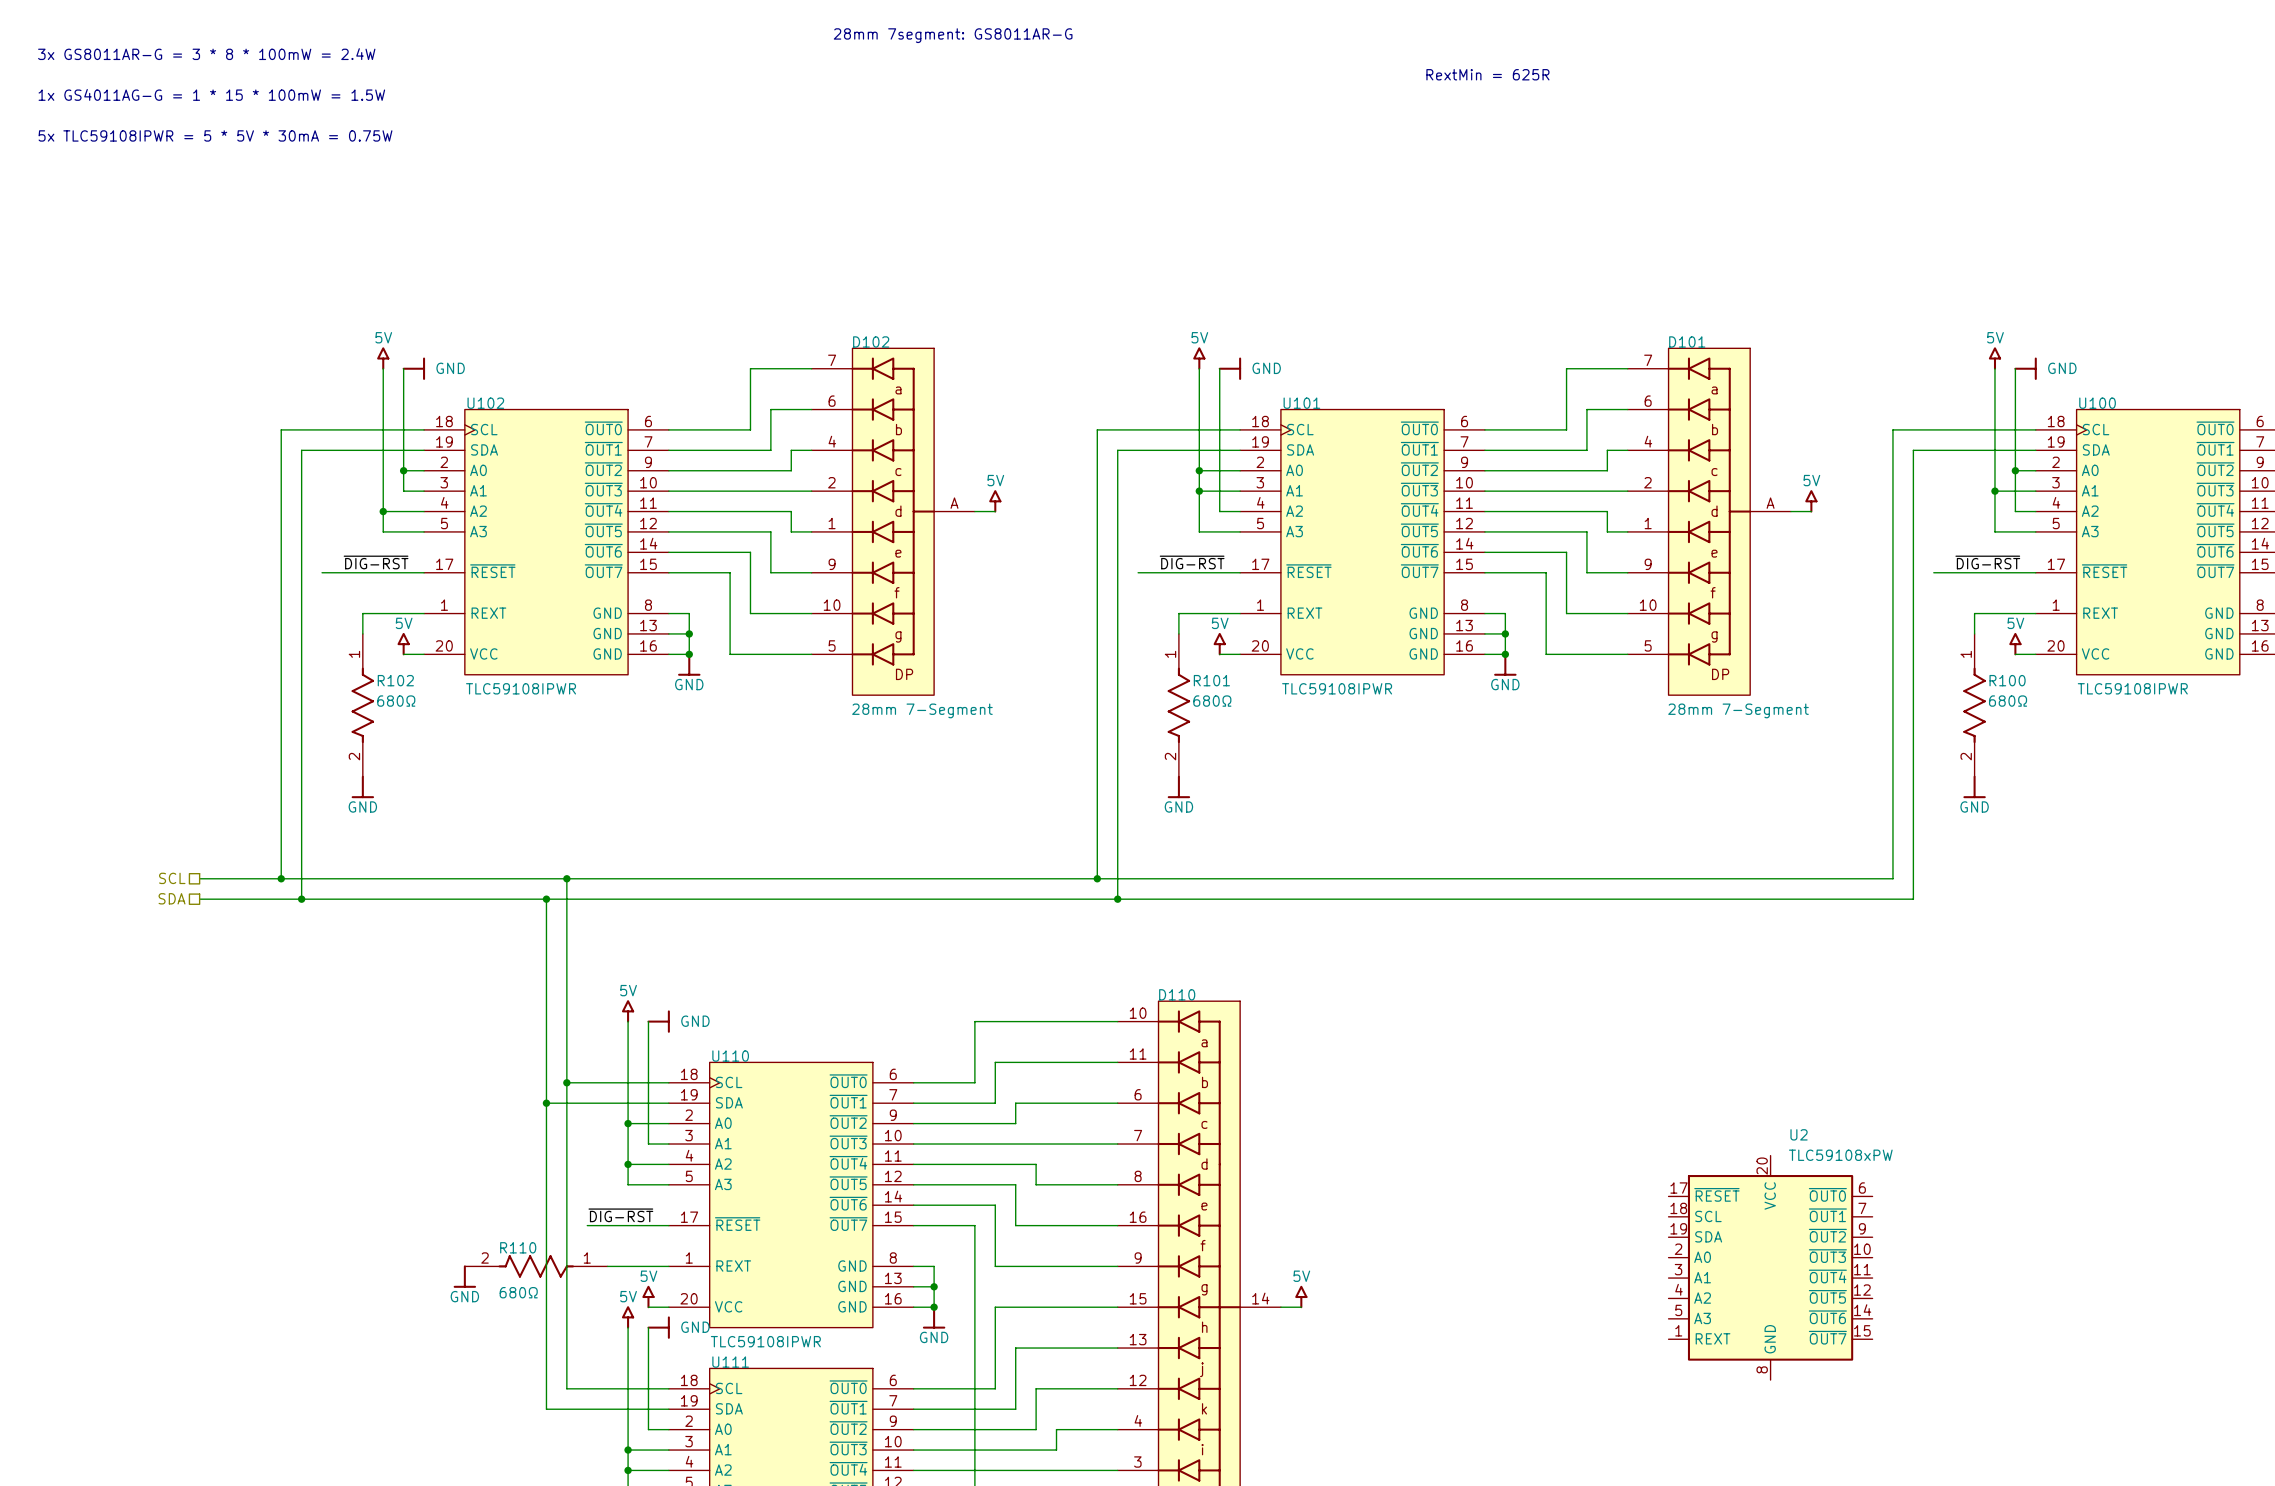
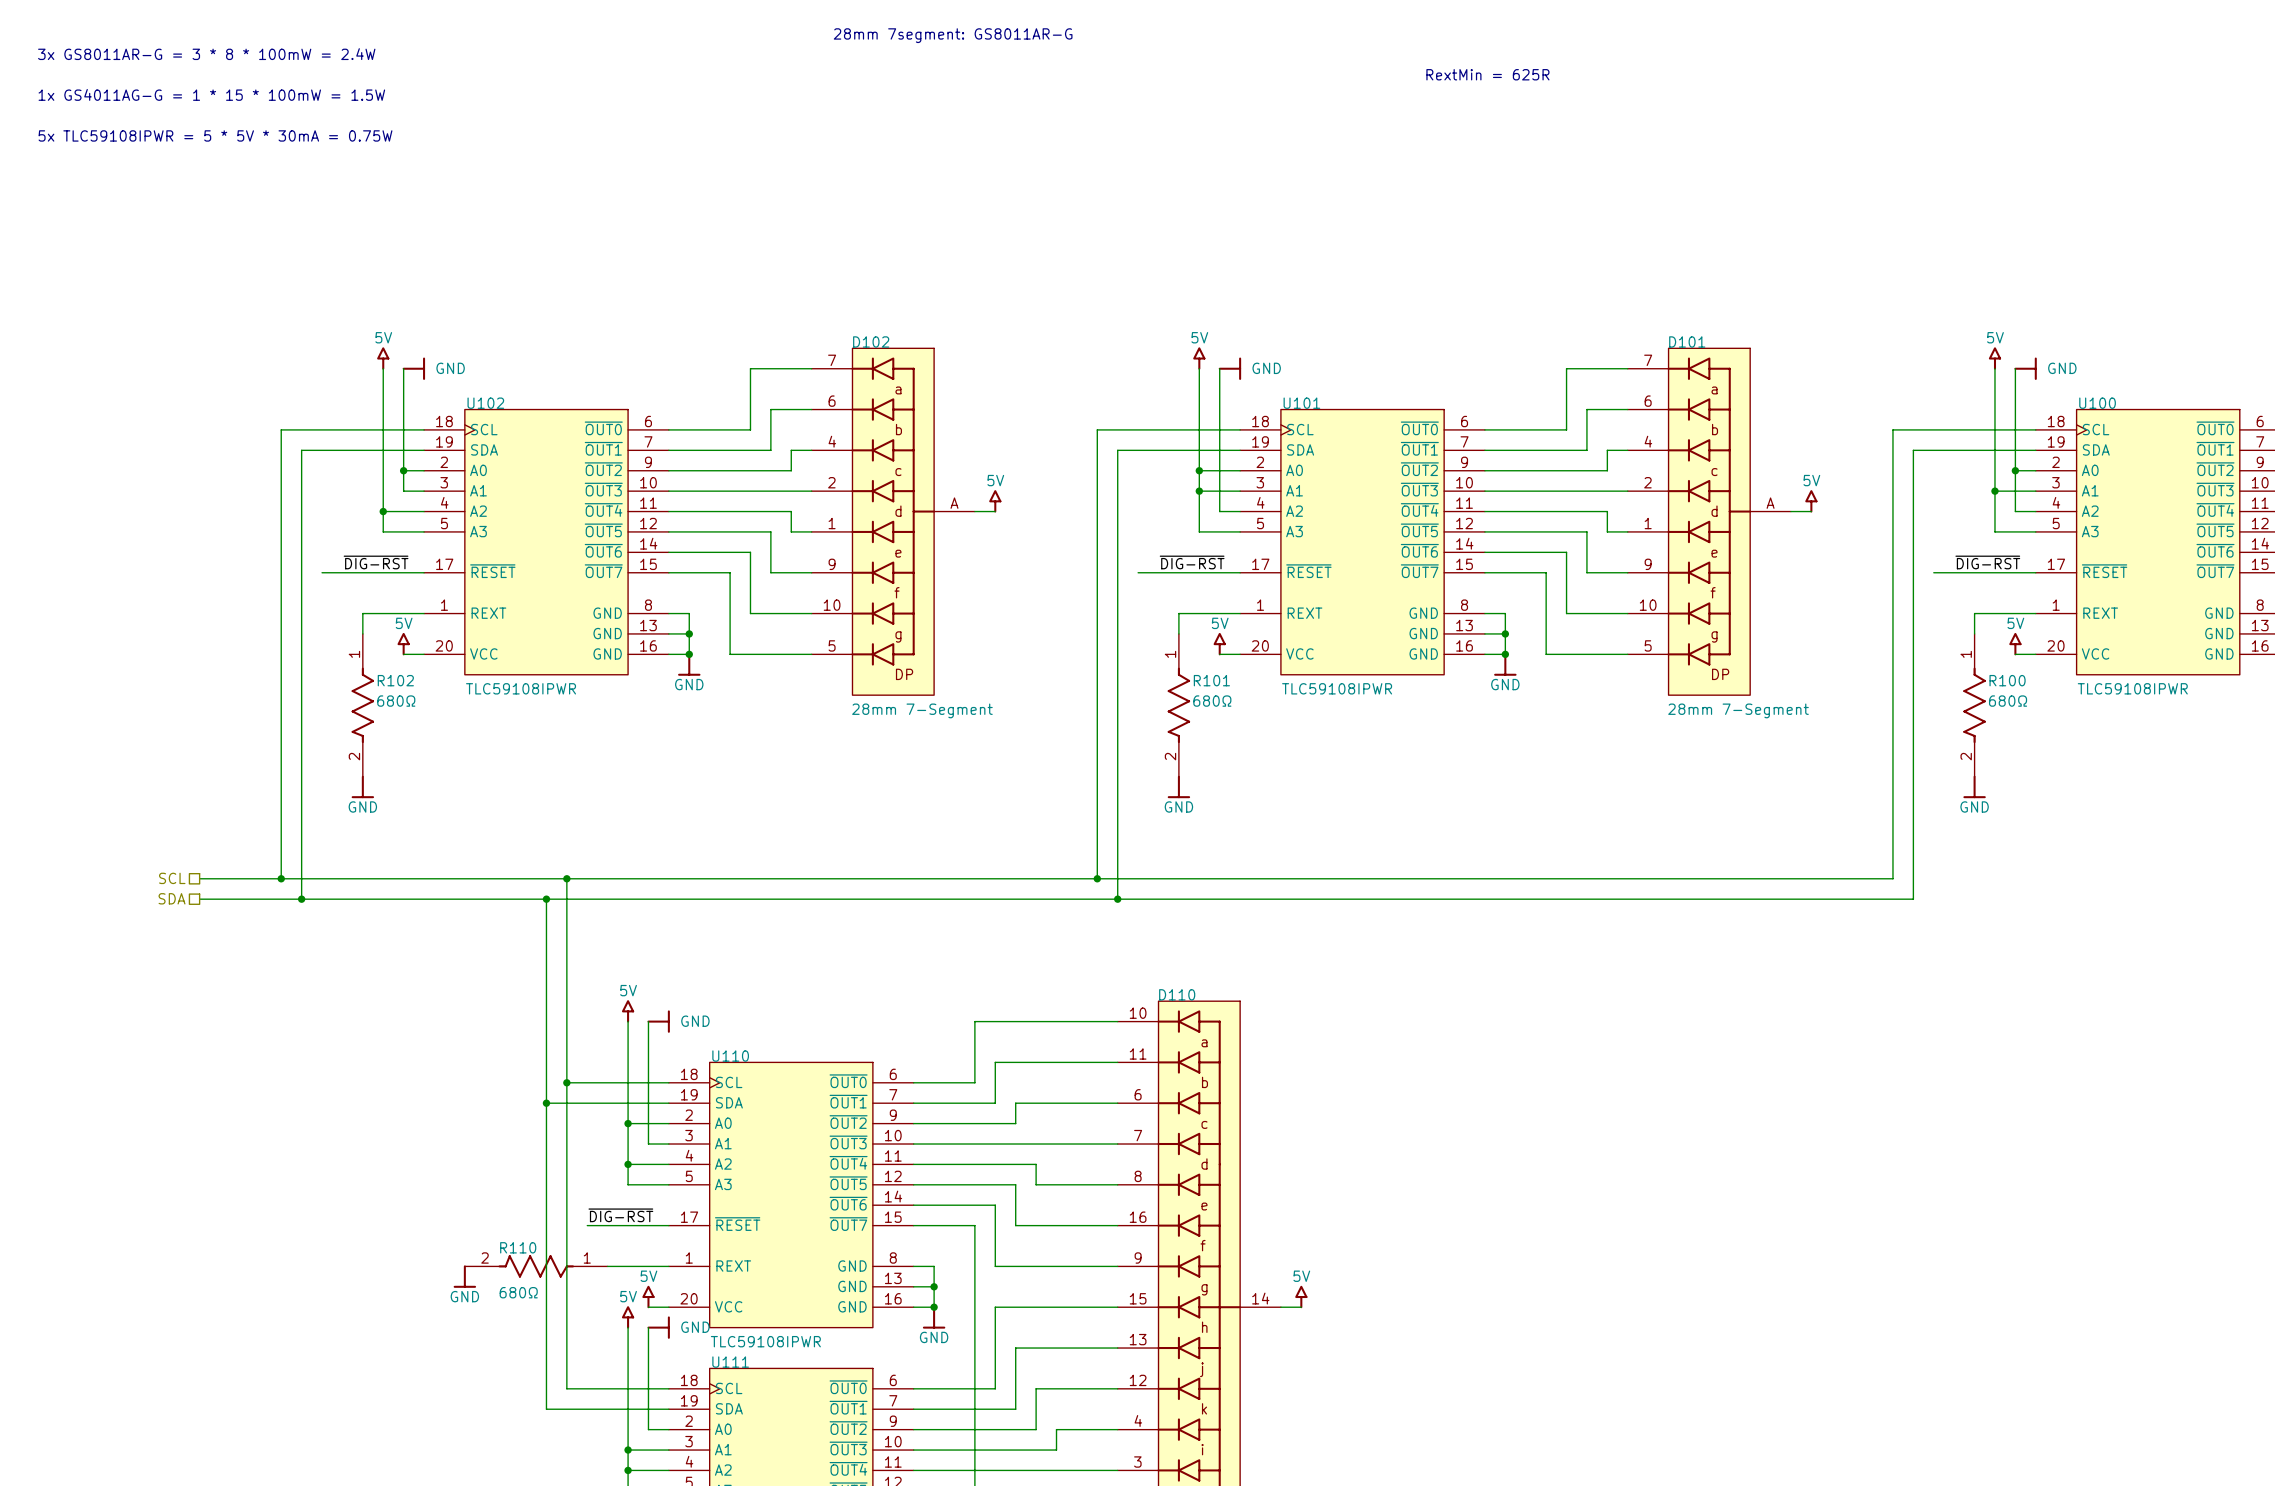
U2: TLC59108xPW (1770, 1267) -> none

